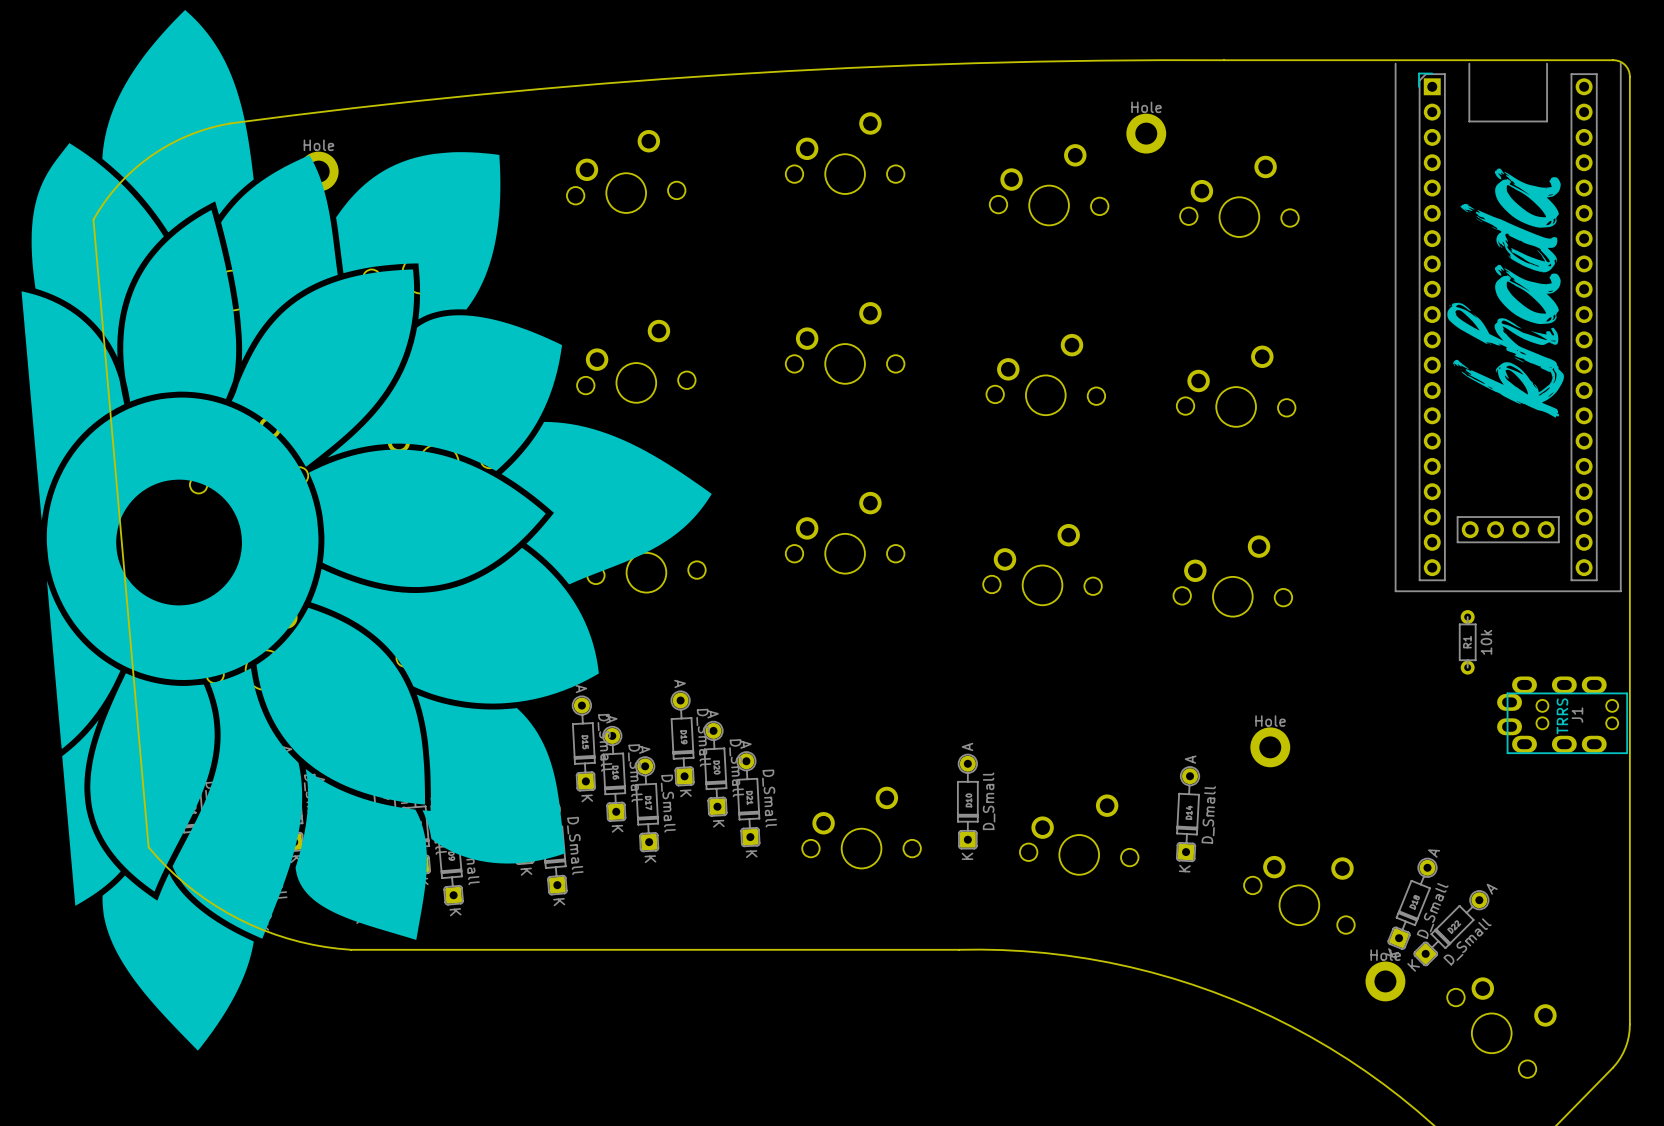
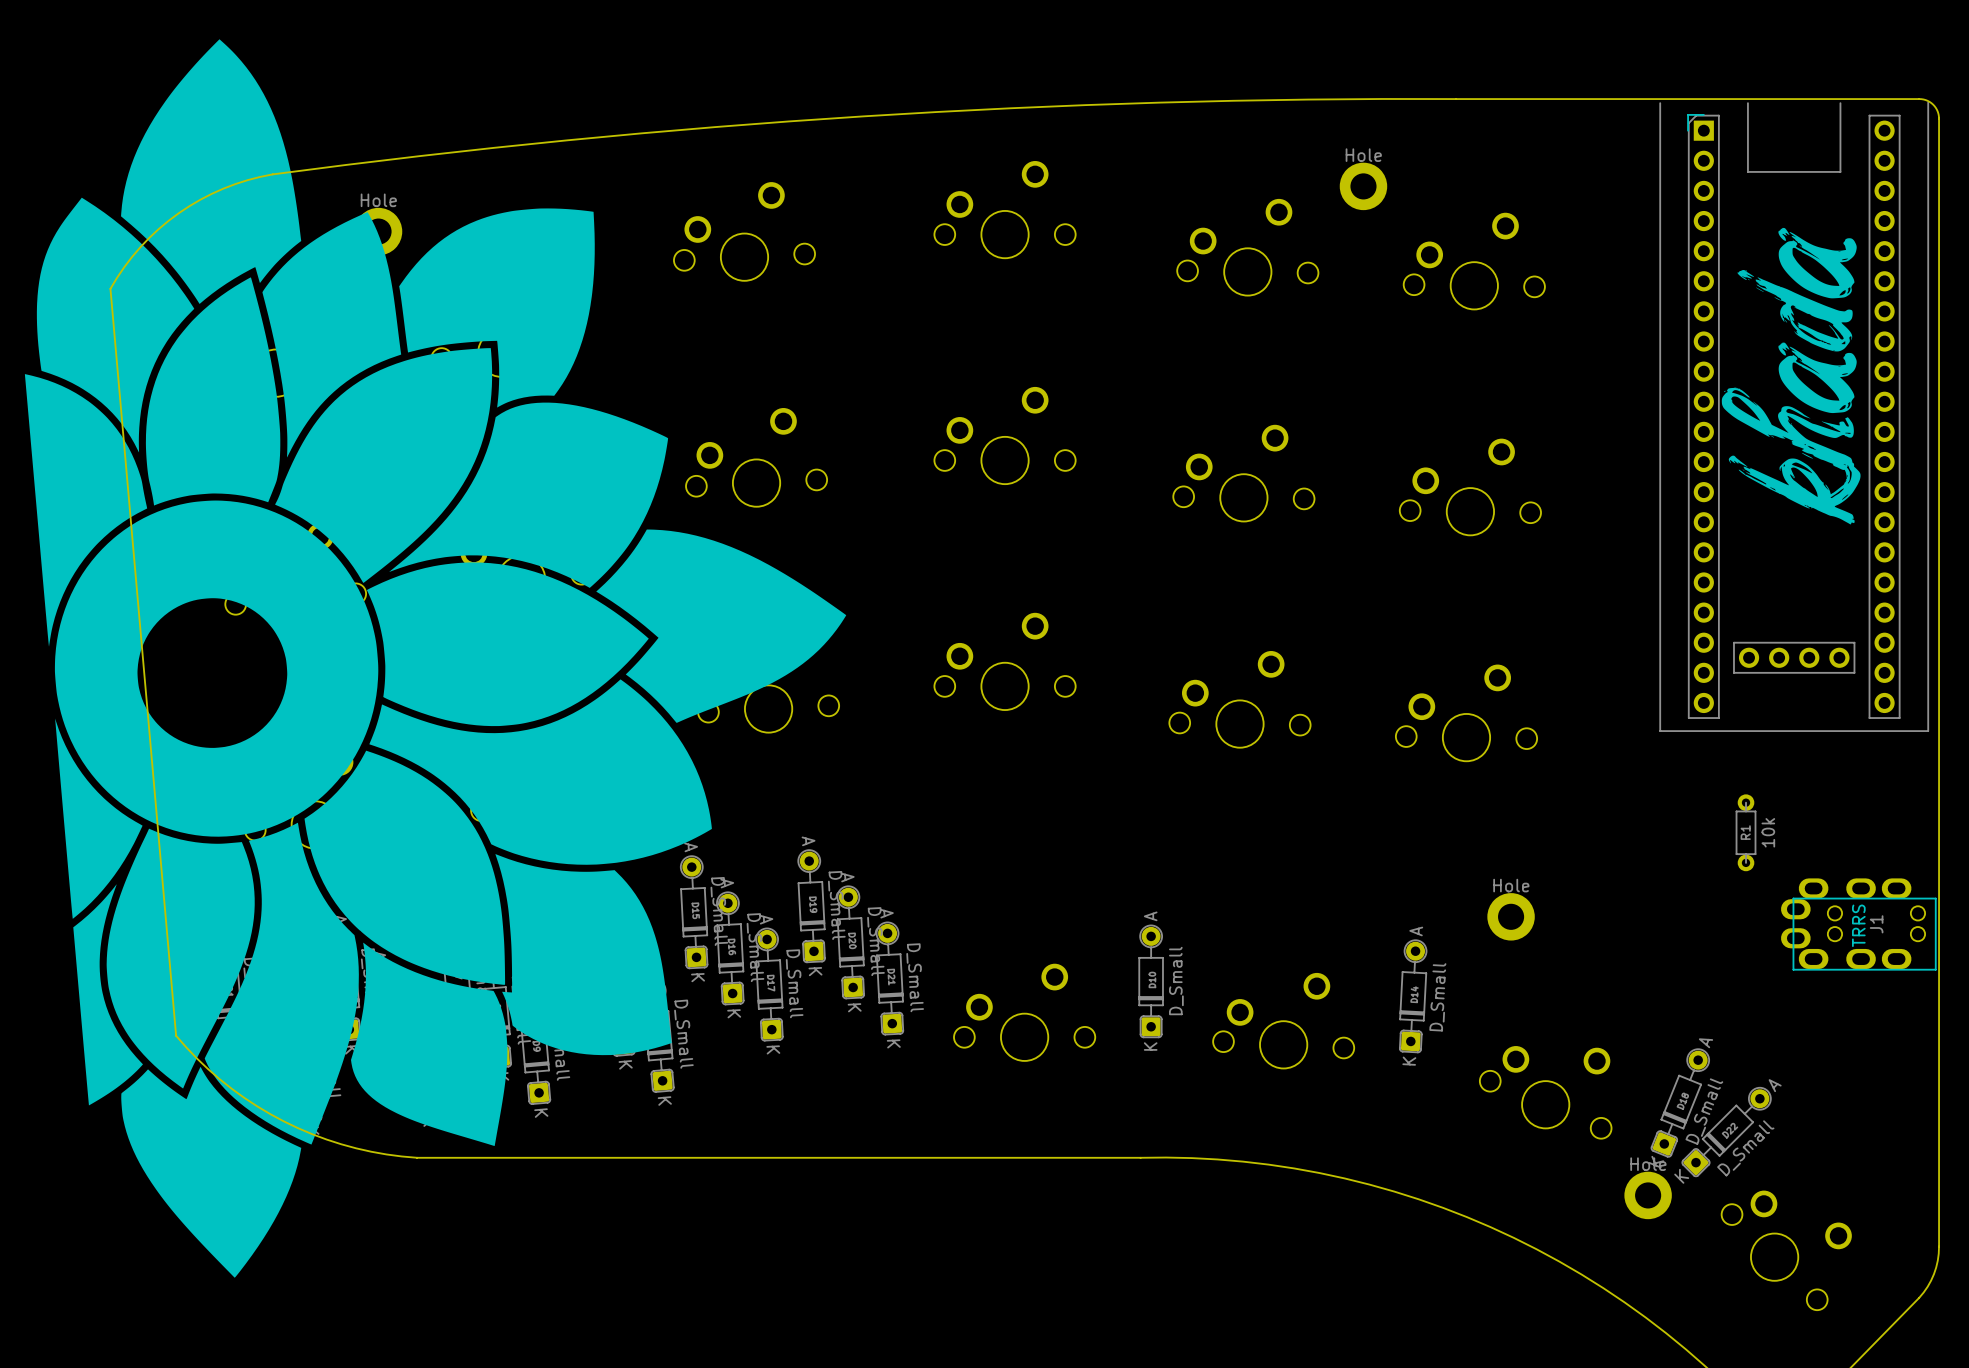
R1 position: (1467, 642) -> (1746, 832)
J1 position: (1562, 715) -> (1858, 924)

